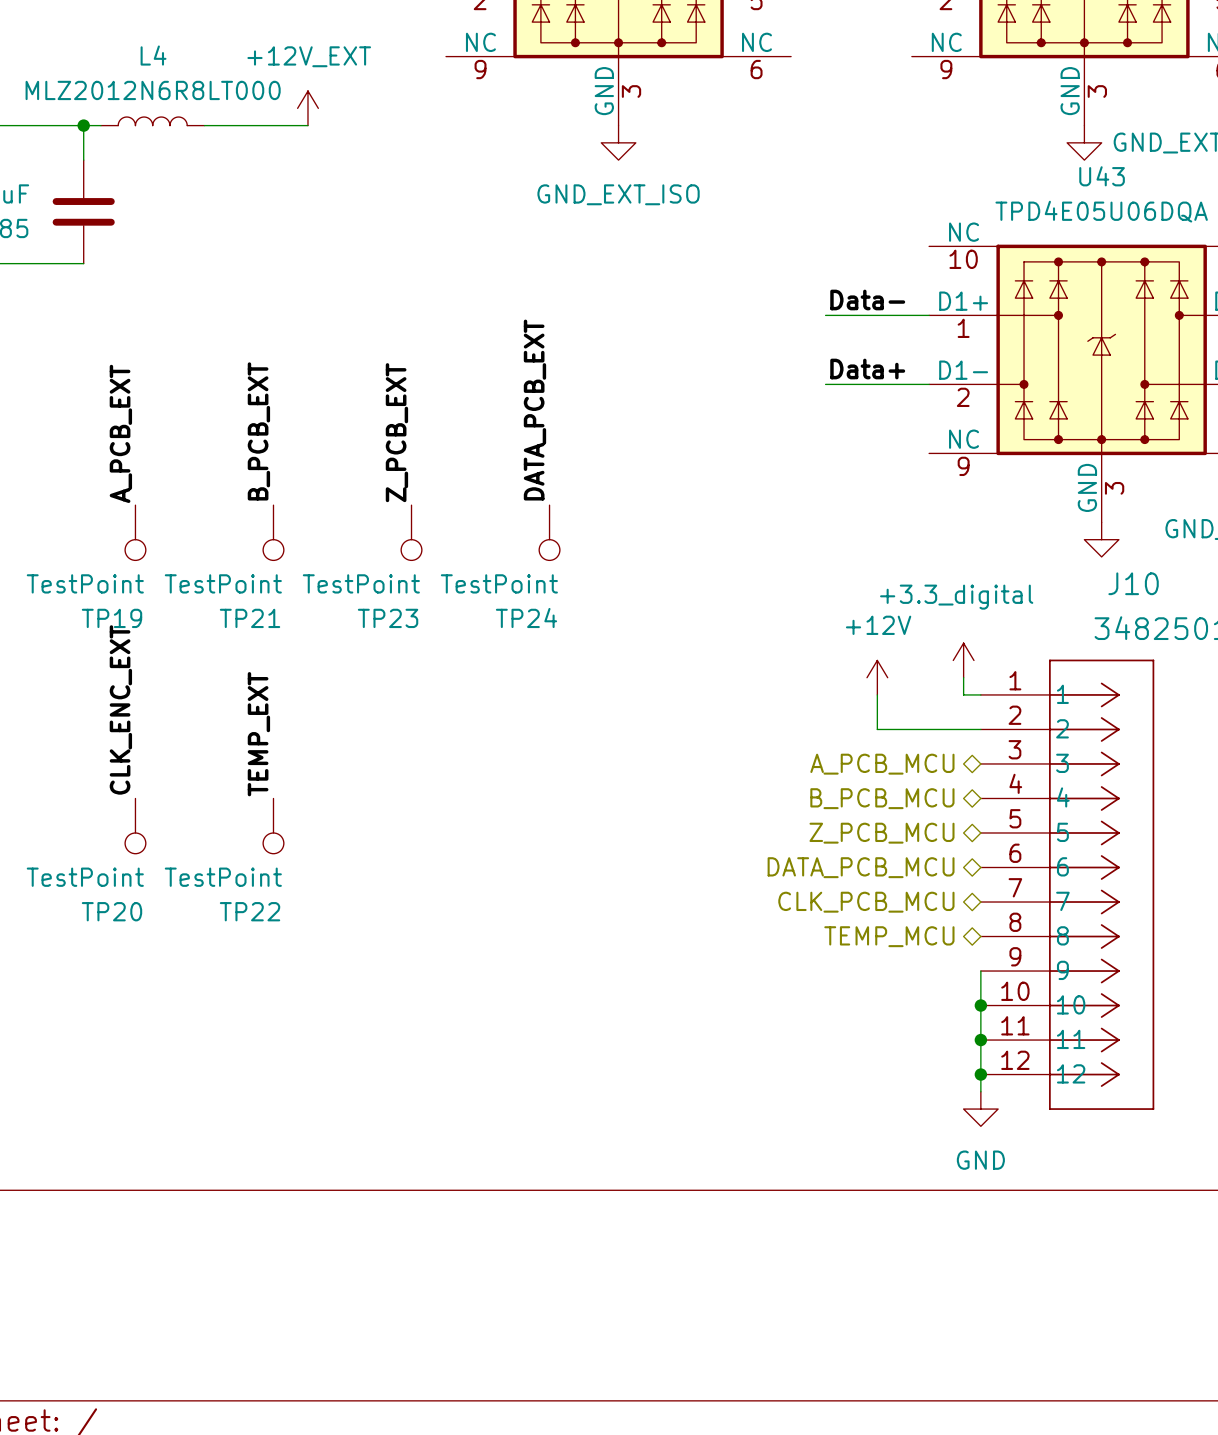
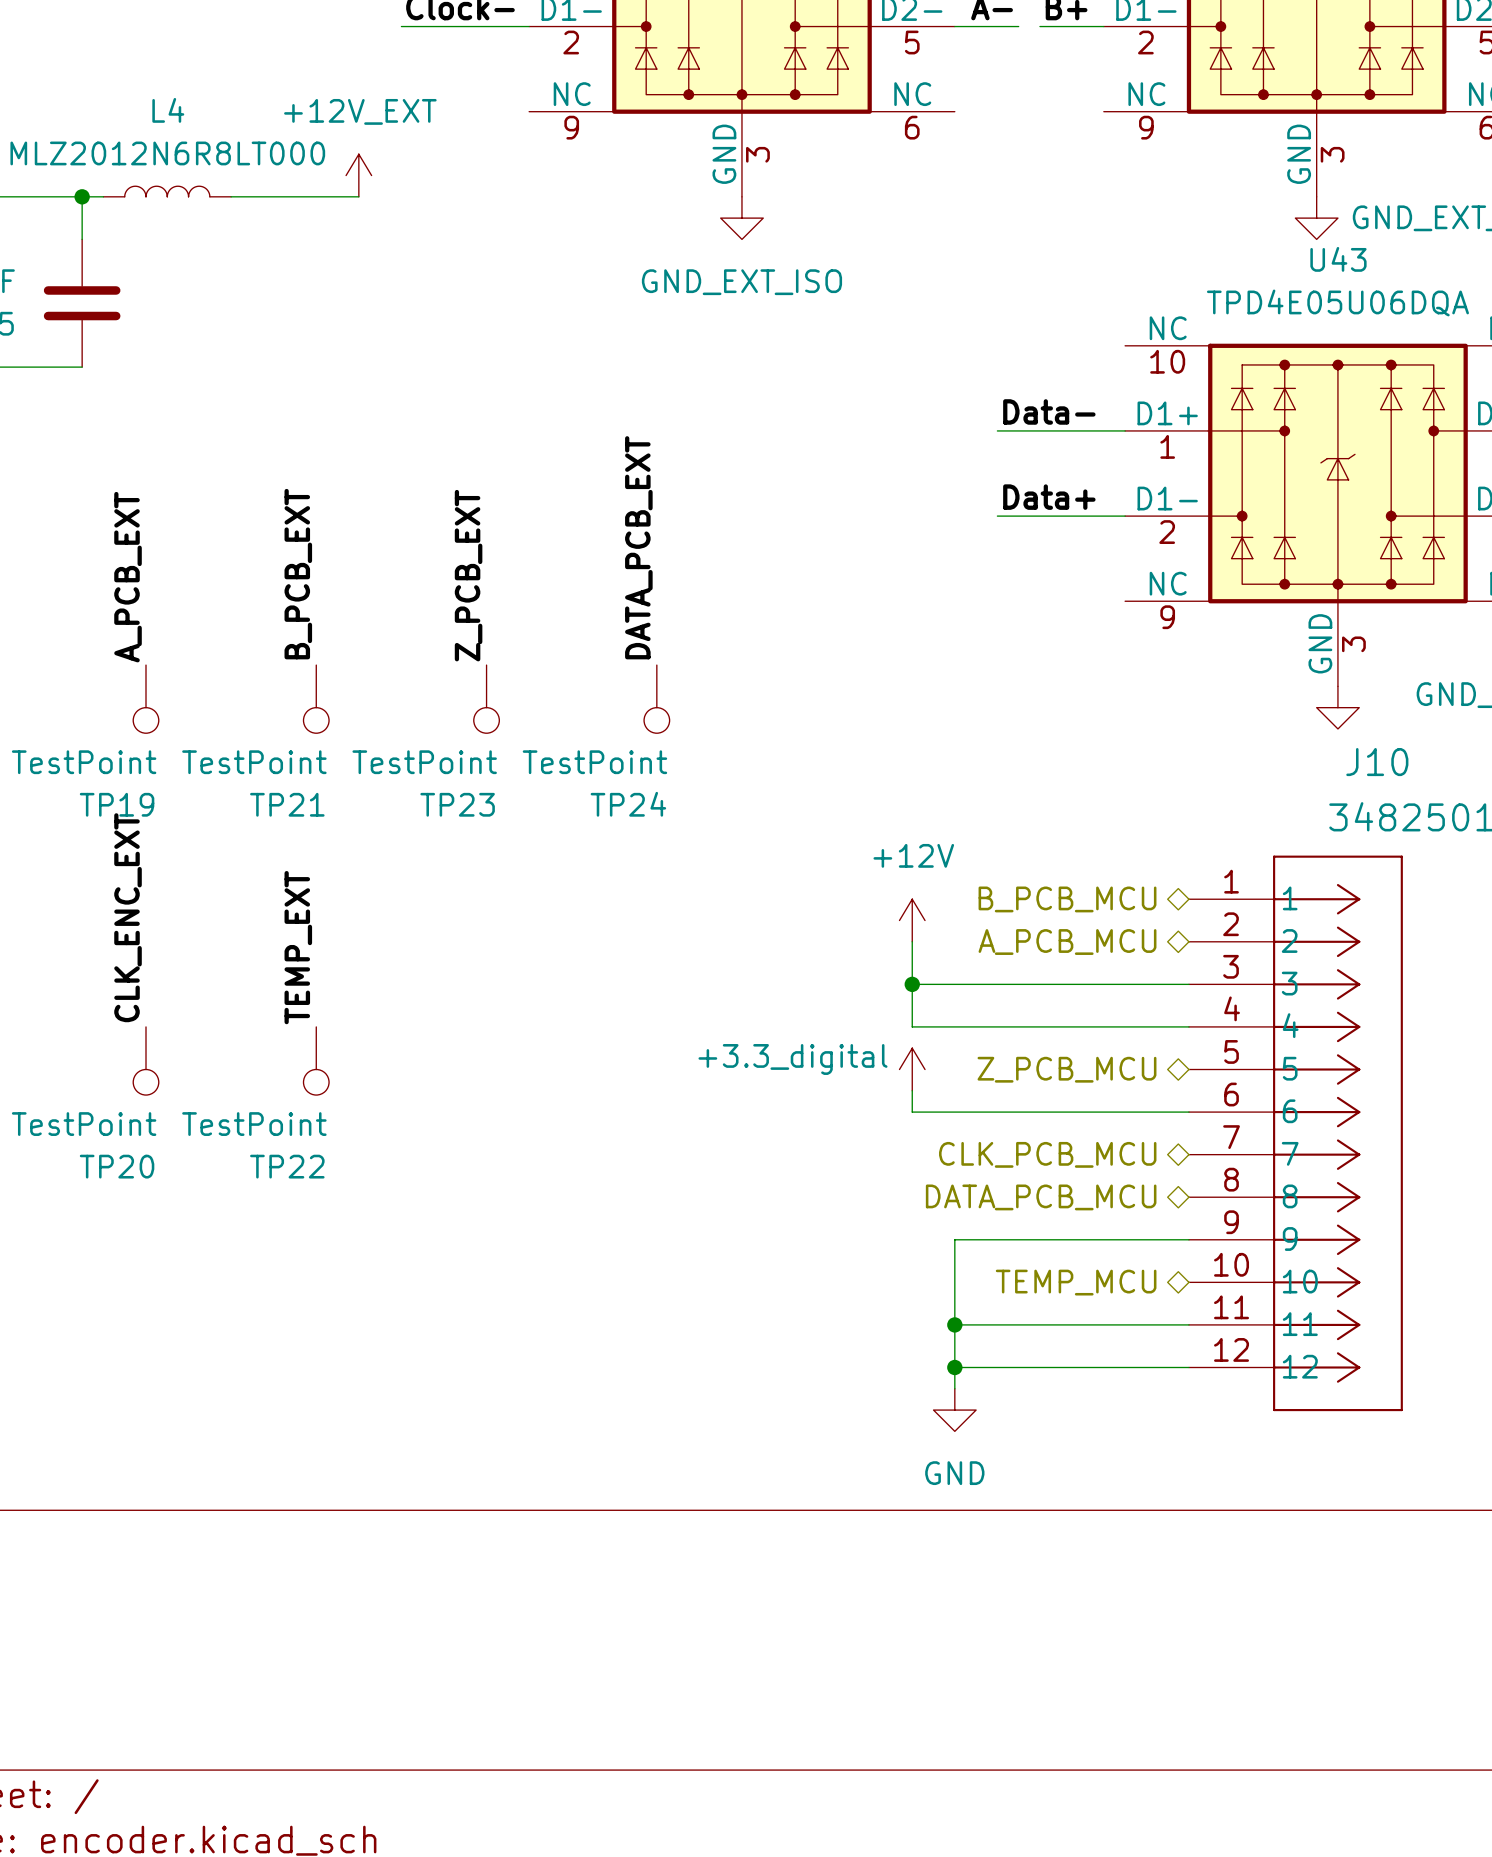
power symbol text position: +3.3_digital (956, 597) -> +3.3_digital (793, 1059)
power symbol position: +3.3_digital (963, 660) -> +3.3_digital (912, 1069)
power symbol position: +12V (877, 677) -> +12V (912, 920)
wire: (963, 677) (963, 694) (980, 694) -> none
wire: (877, 694) (877, 729) (980, 729) -> none
wire: none -> (912, 941) (912, 1026) (1188, 1026)
wire: none -> (912, 984) (1188, 984)
junction: none -> (912, 984)
hierarchical label position: A_PCB_MCU (882, 764) -> A_PCB_MCU (1067, 942)
hierarchical label position: B_PCB_MCU (882, 798) -> B_PCB_MCU (1067, 899)
wire: none -> (912, 1090) (912, 1112) (1188, 1112)
hierarchical label: DATA_PCB_MCU (861, 867) -> none
hierarchical label: TEMP_MCU (889, 936) -> DATA_PCB_MCU (1041, 1197)
wire: (980, 971) (980, 1091) -> (1188, 1239) (954, 1239) (954, 1388)
hierarchical label: none -> TEMP_MCU (1076, 1282)
junction: (980, 1005) -> none
wire: none -> (954, 1324) (1188, 1324)
junction: none -> (954, 1324)
junction: (980, 1040) -> none
wire: none -> (954, 1367) (1188, 1367)
junction: none -> (954, 1367)
junction: (980, 1074) -> none
power symbol position: GND (980, 1109) -> GND (954, 1410)

